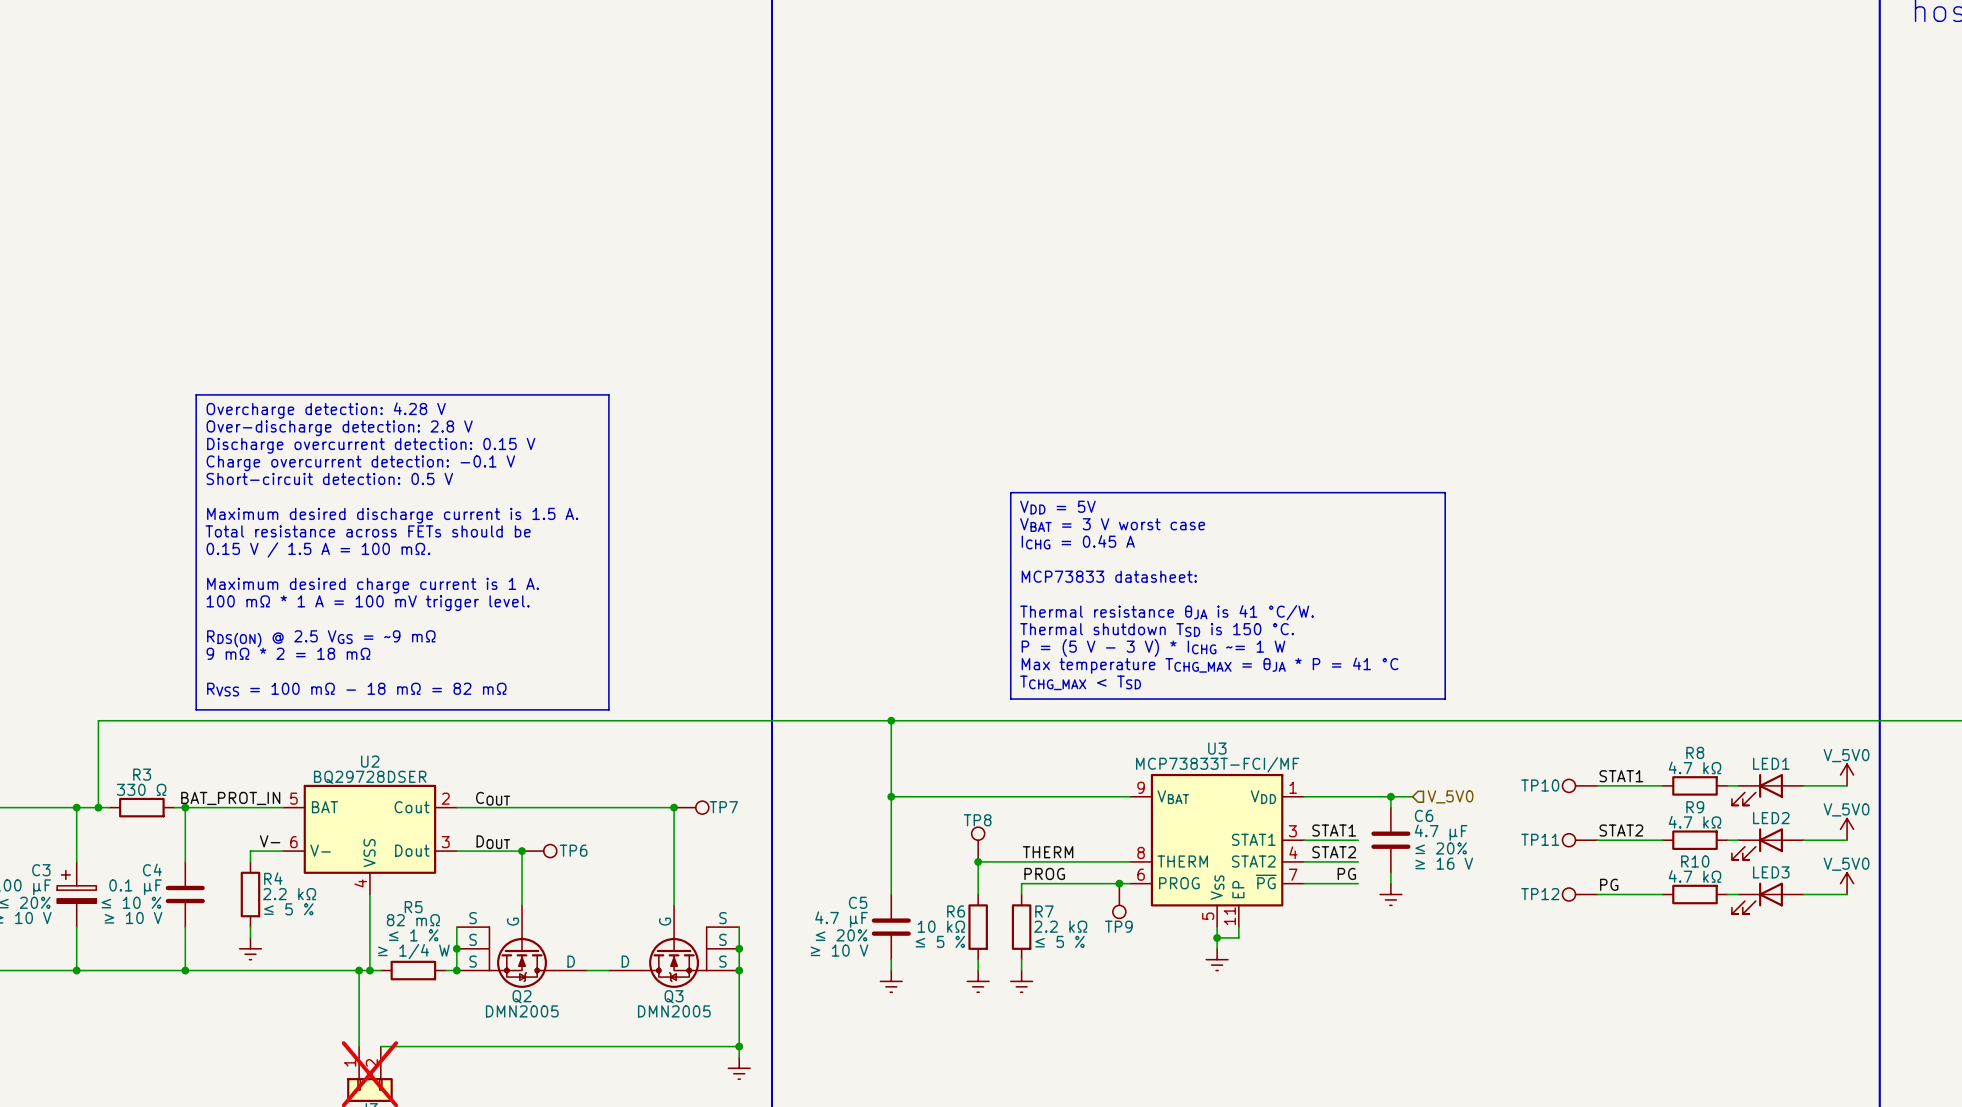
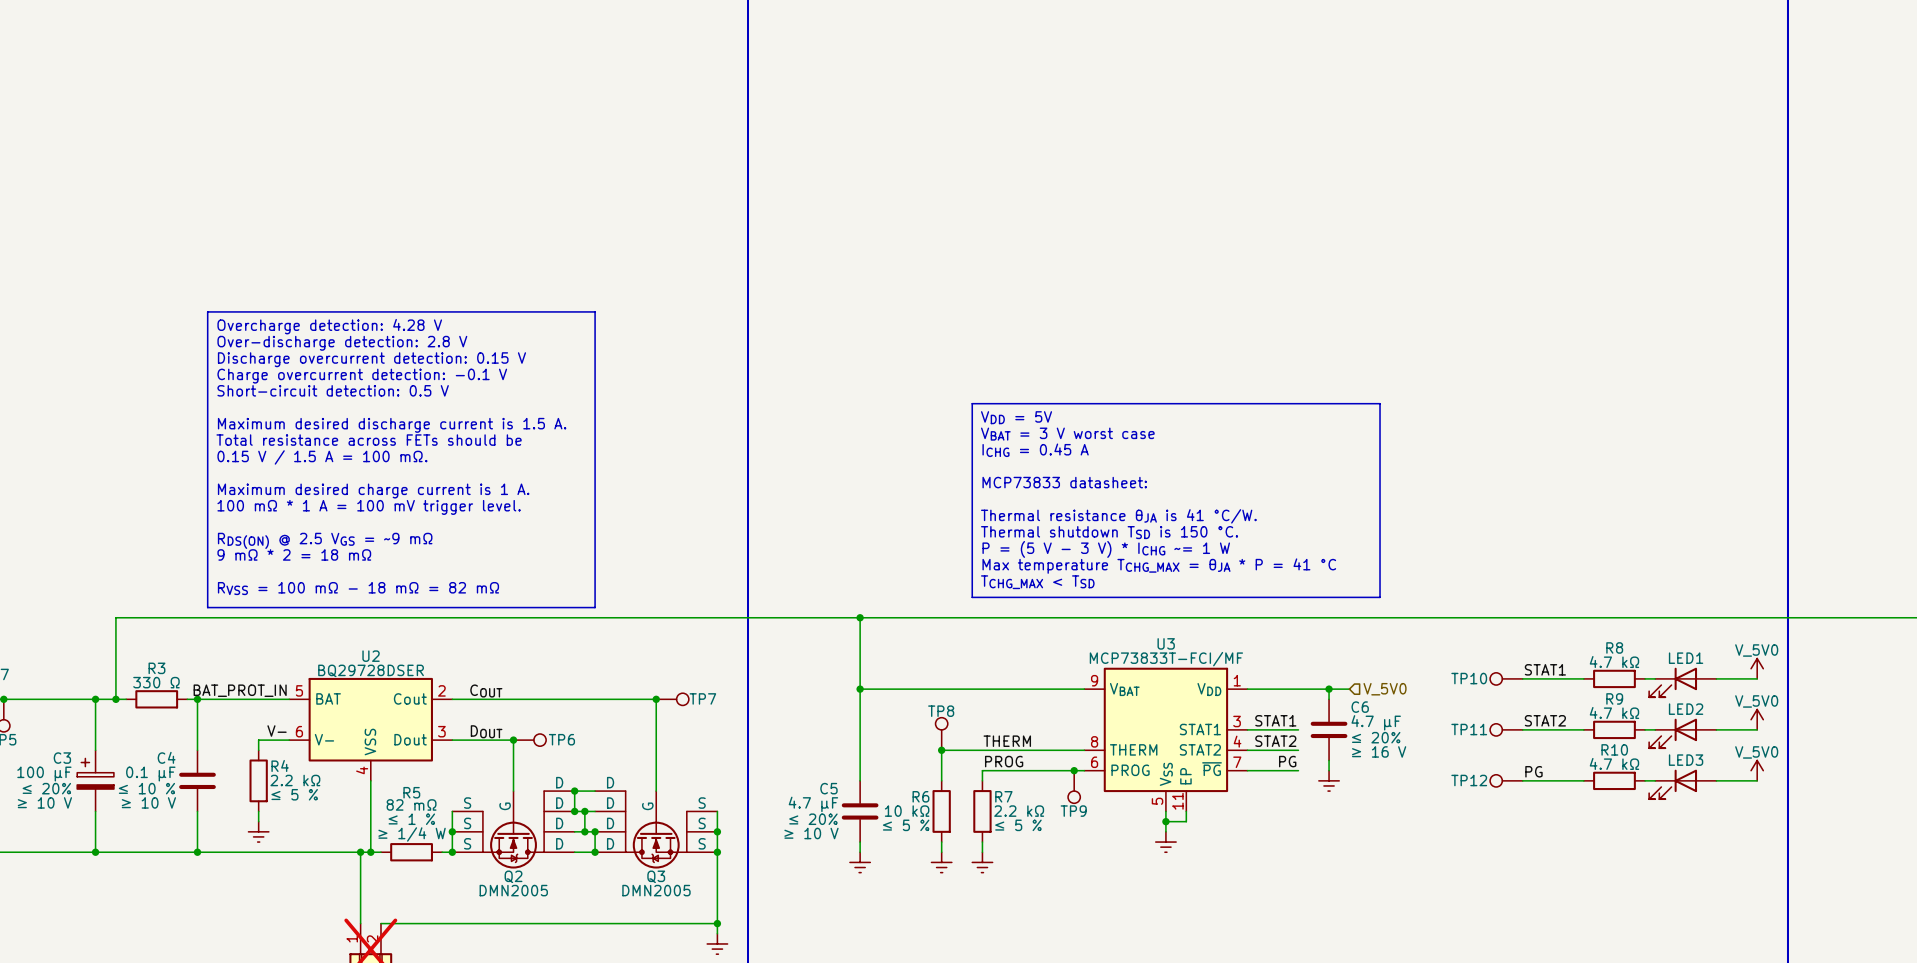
Q2 symbol: [456, 905, 588, 988] -> [452, 791, 575, 869]
junction: none -> (574, 791)
wire: none -> (595, 791) (574, 791) (574, 811) (595, 811)
Q3 symbol: [608, 905, 740, 988] -> [595, 791, 718, 869]
junction: none -> (574, 811)
wire: none -> (584, 811) (584, 831)
junction: none -> (584, 811)
wire: none -> (574, 831) (595, 831) (595, 852)
junction: none -> (584, 831)
junction: none -> (595, 831)
junction: none -> (595, 852)

